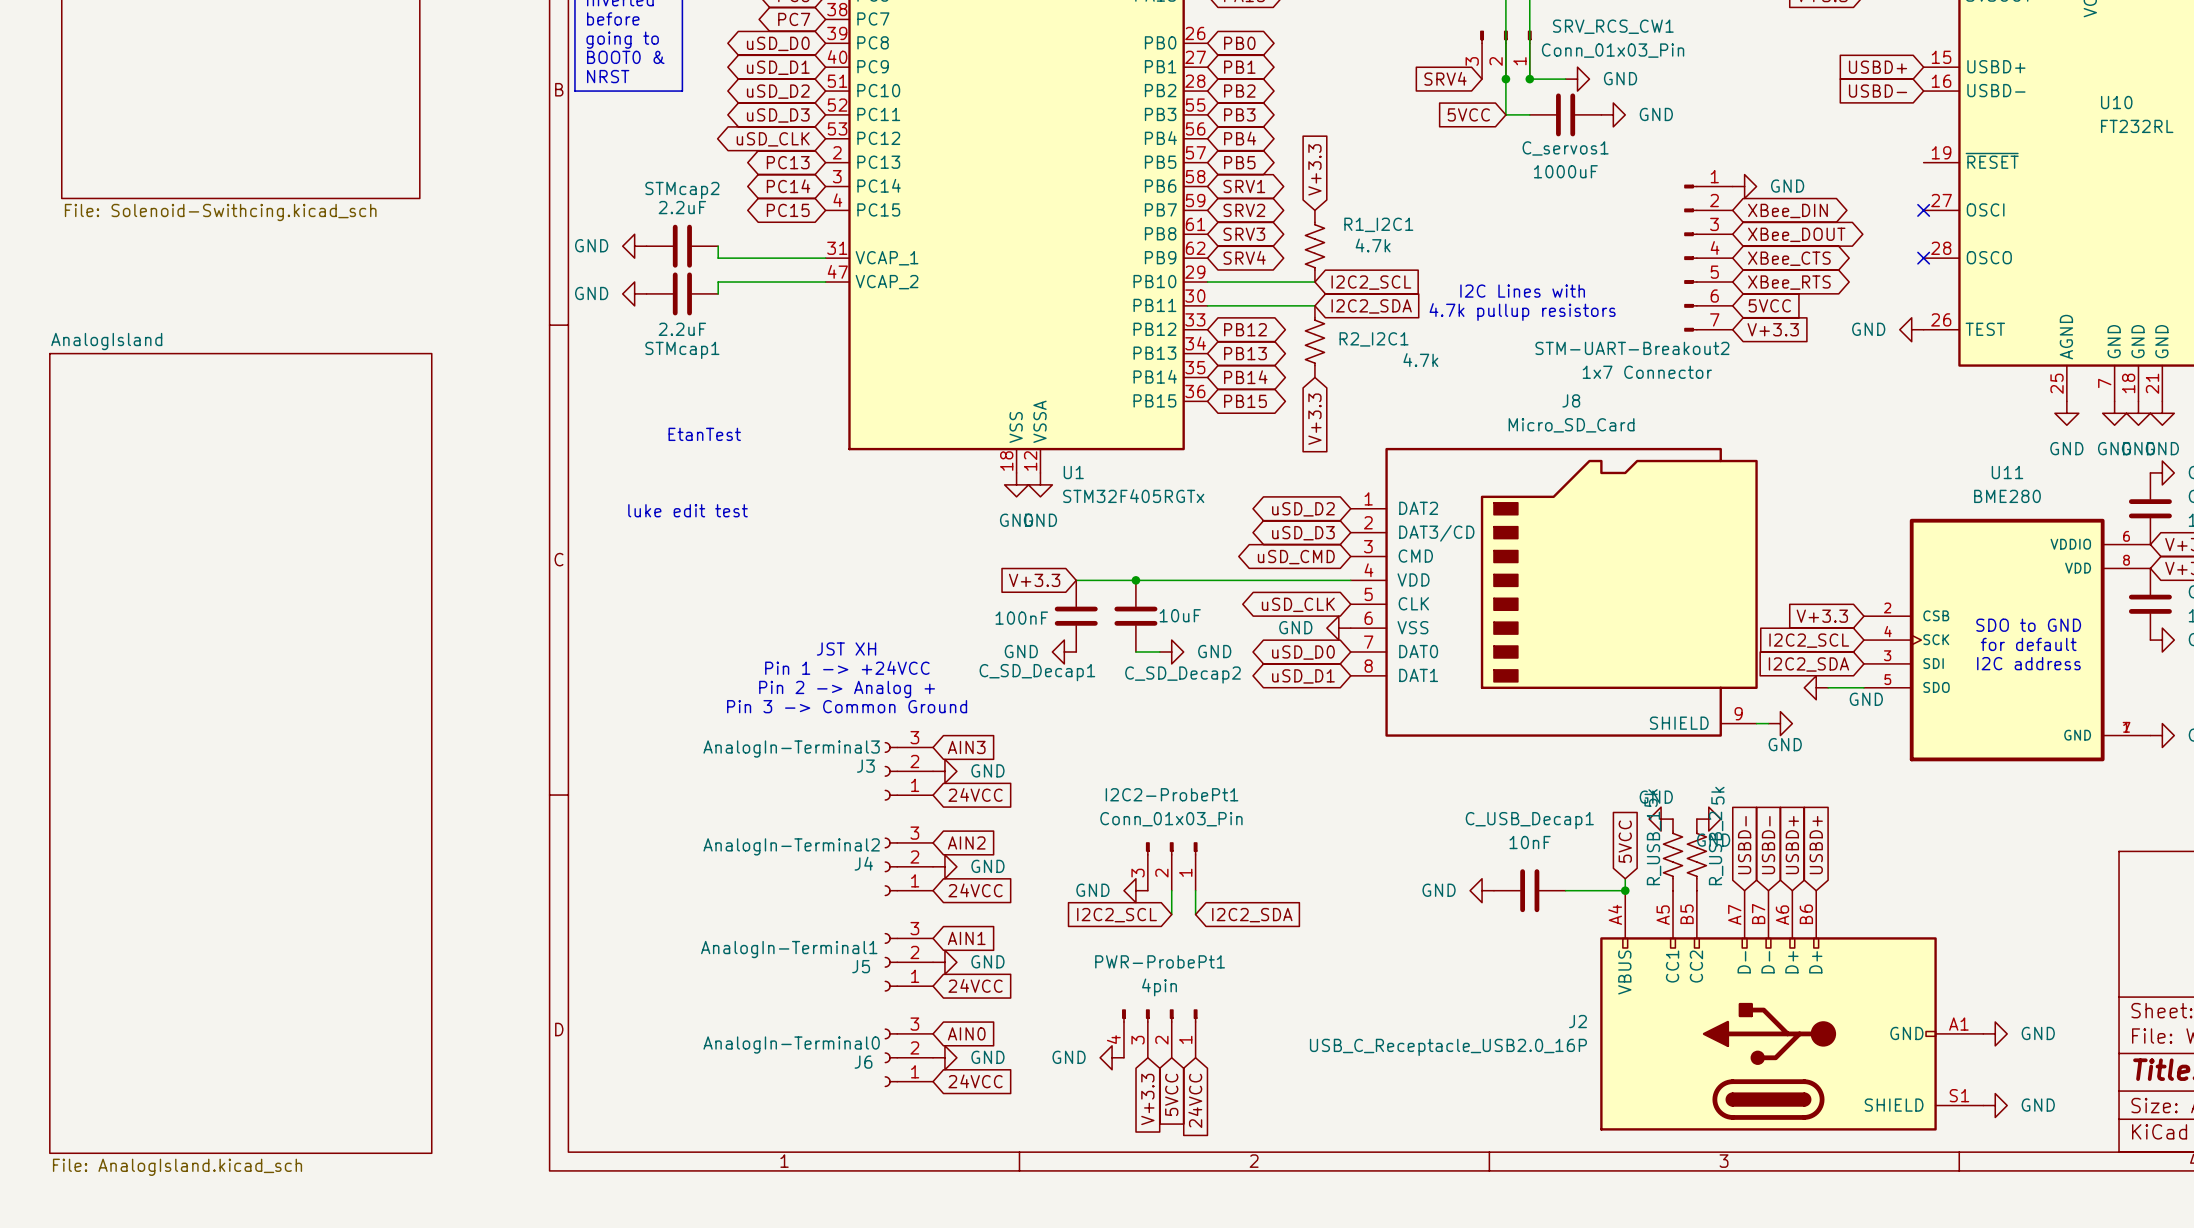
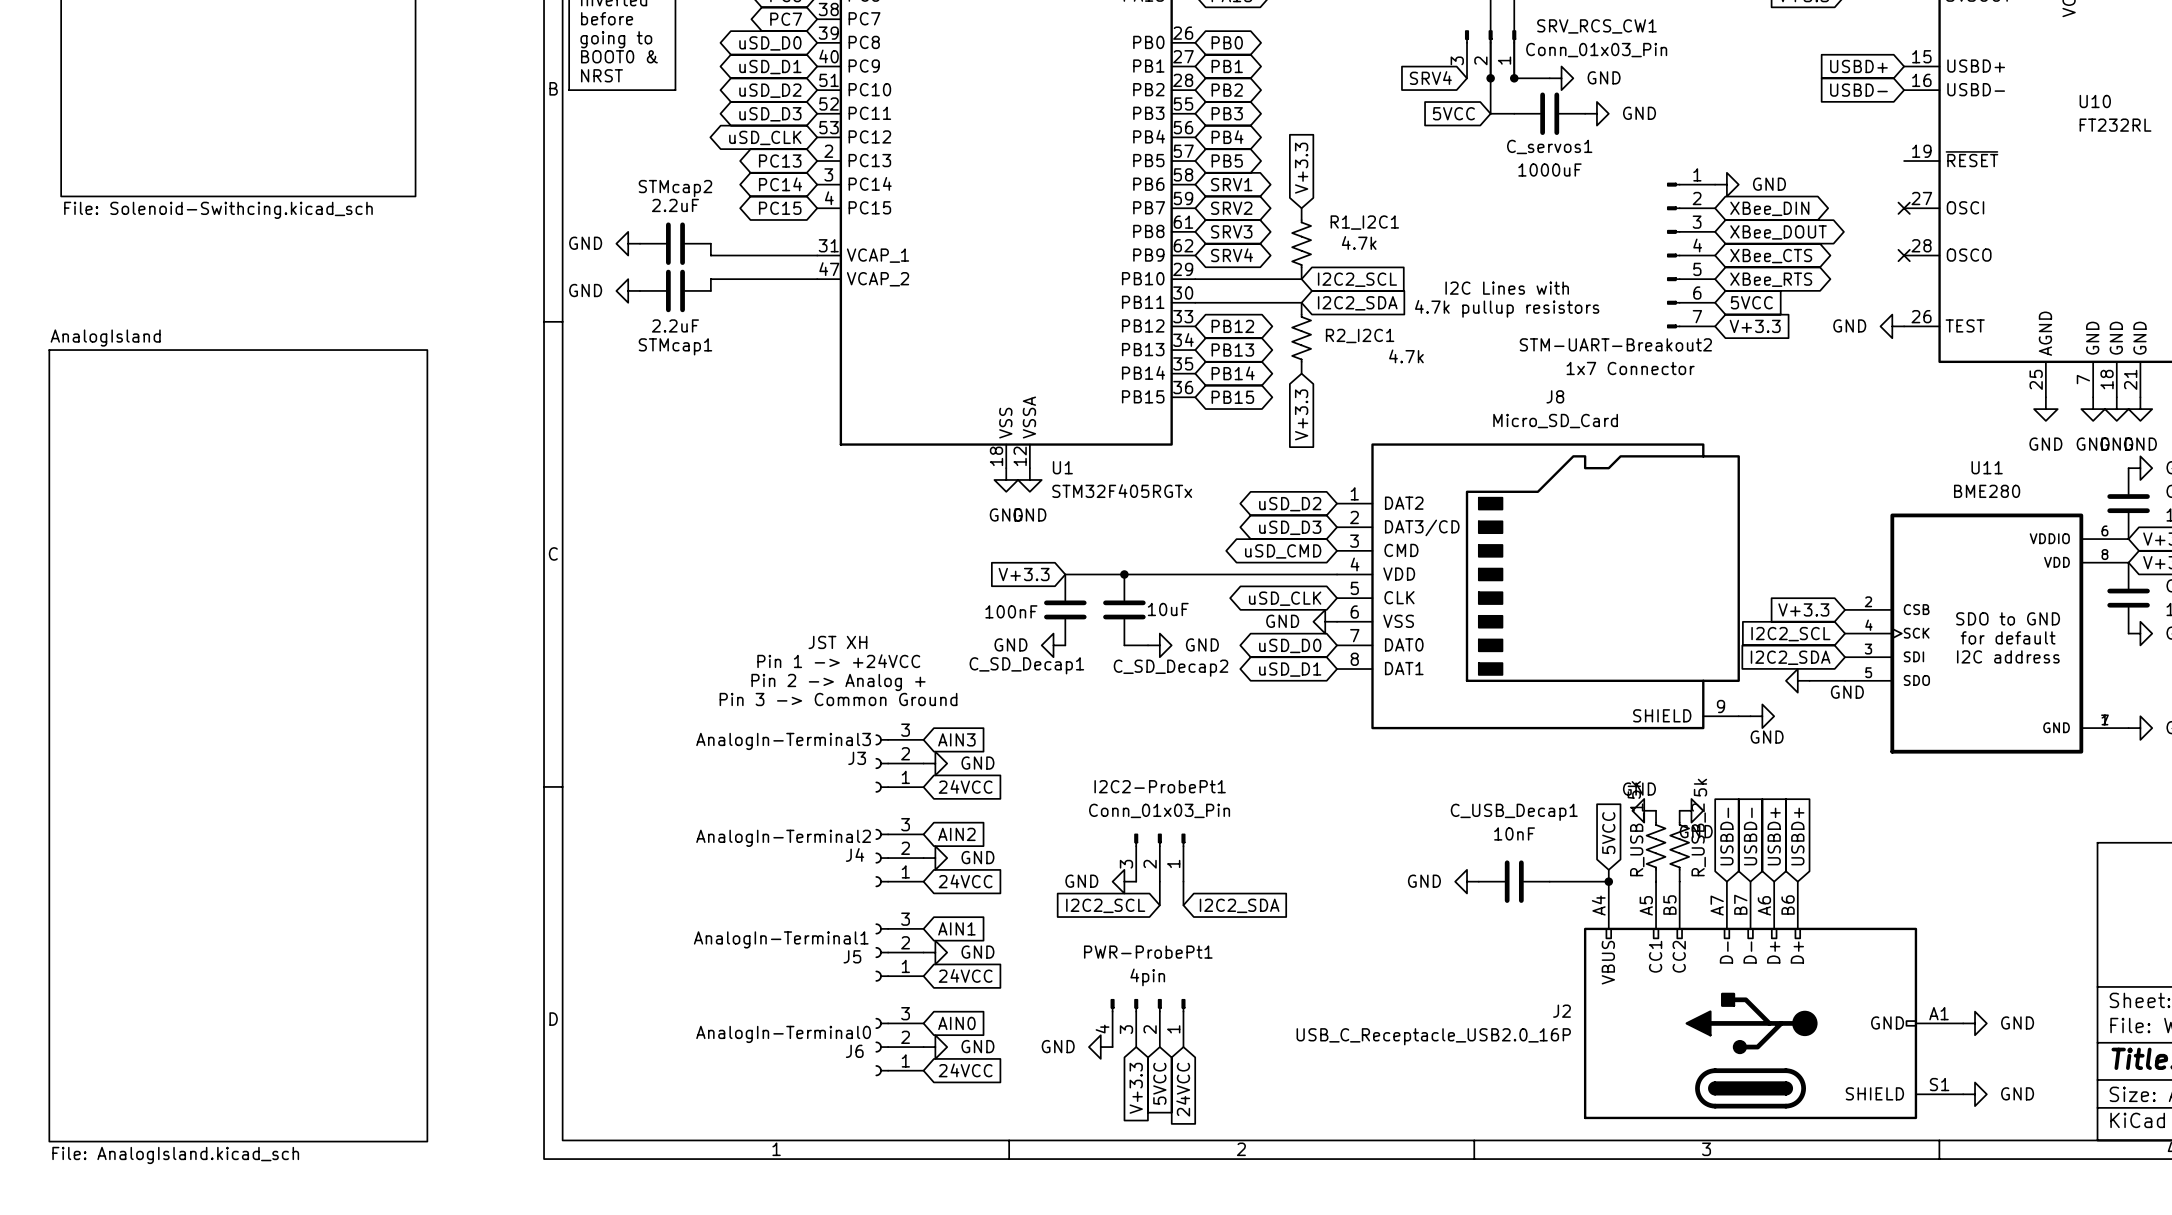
text: EtanTest (704, 434) -> none
text: luke edit test (688, 510) -> none

